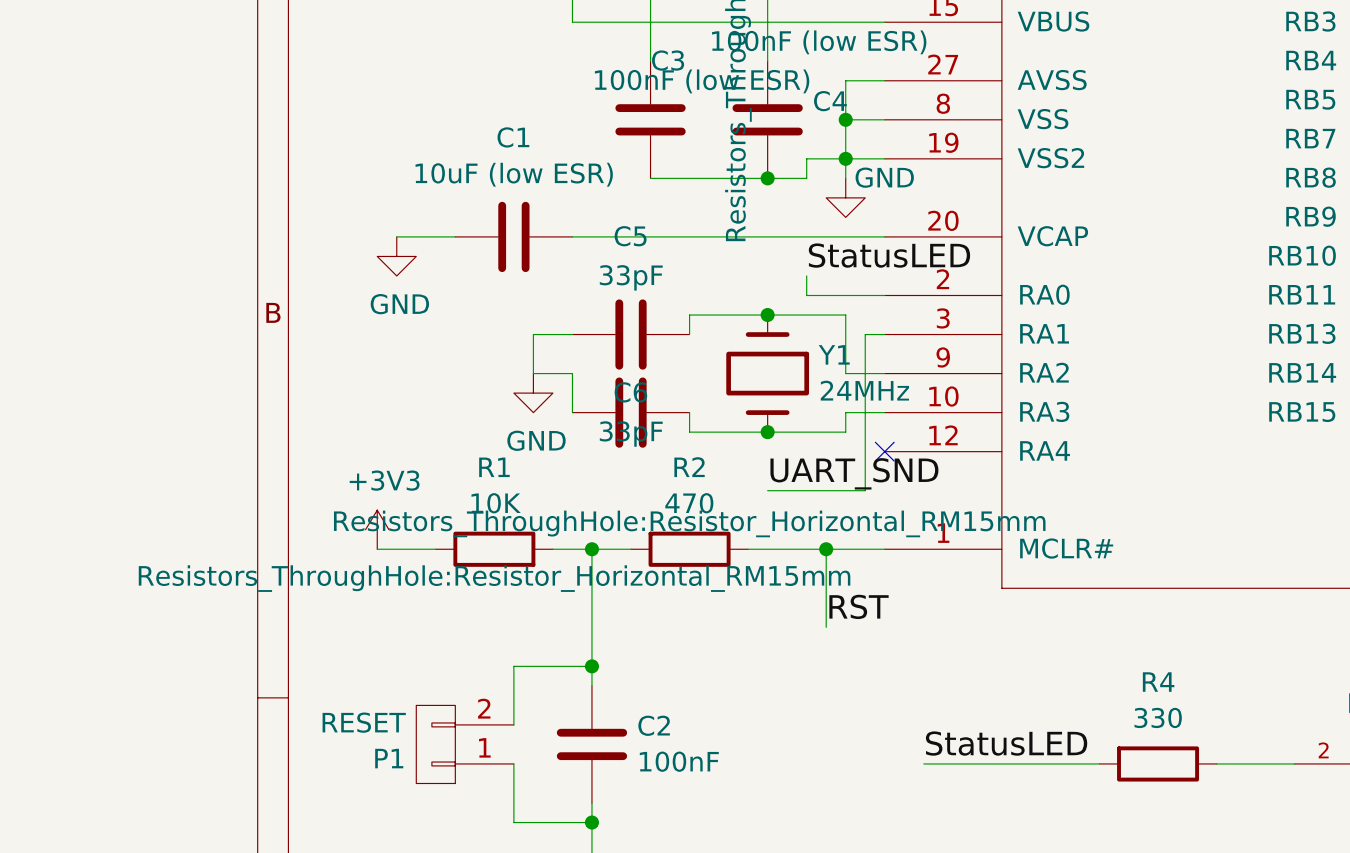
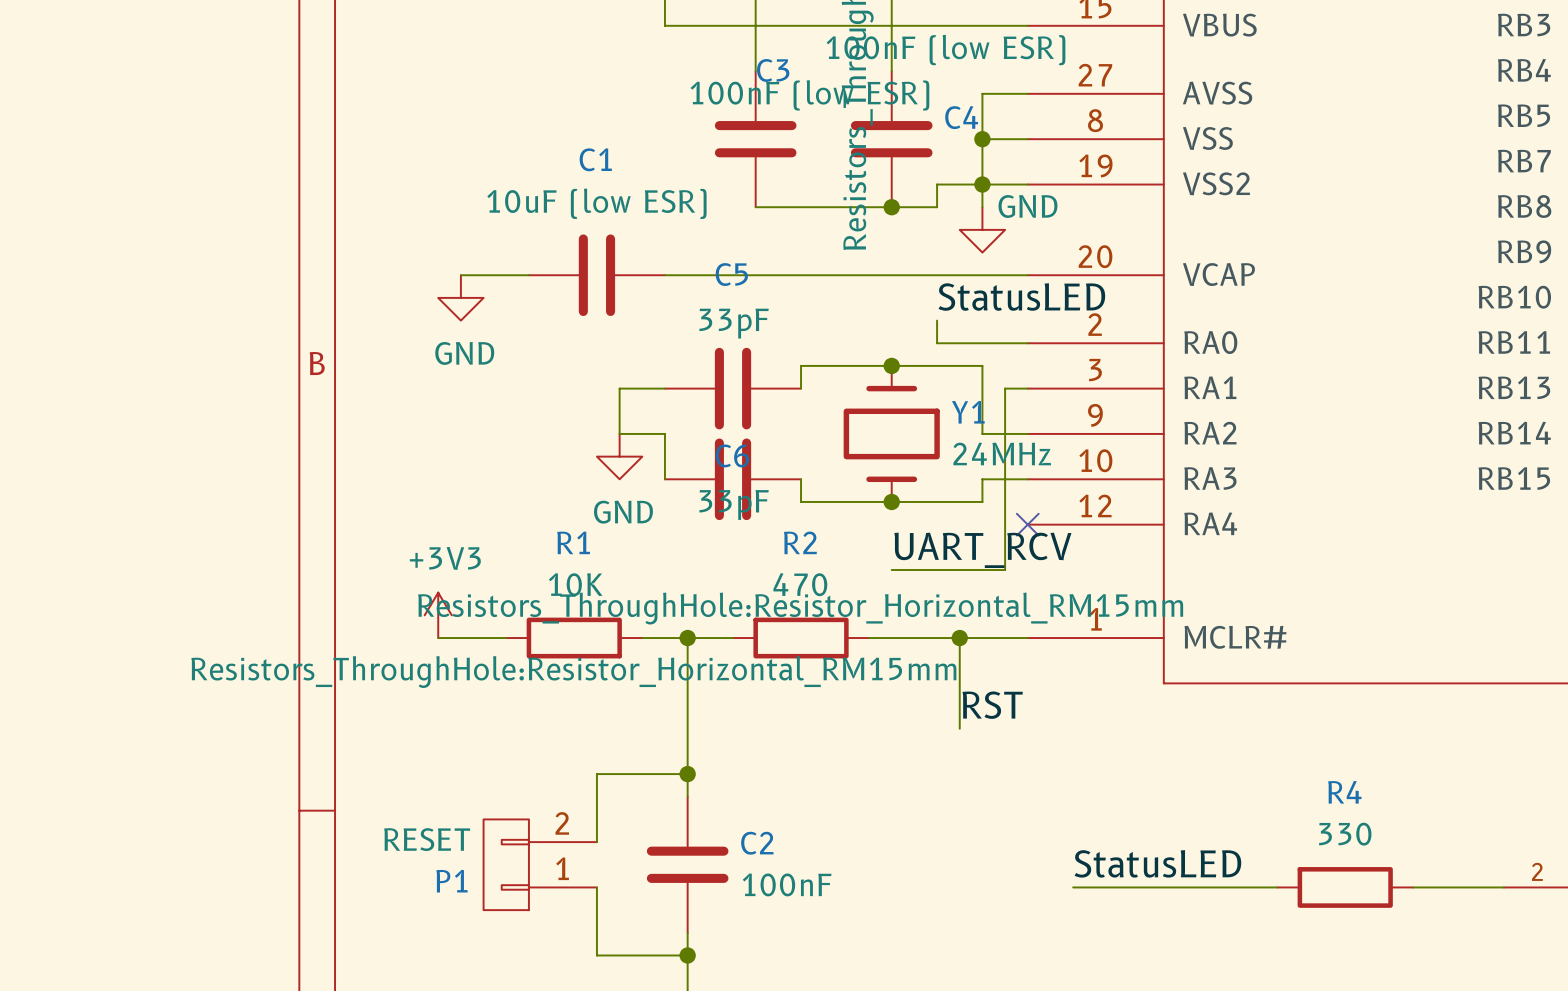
label: UART_SND (854, 473) -> UART_RCV (982, 550)

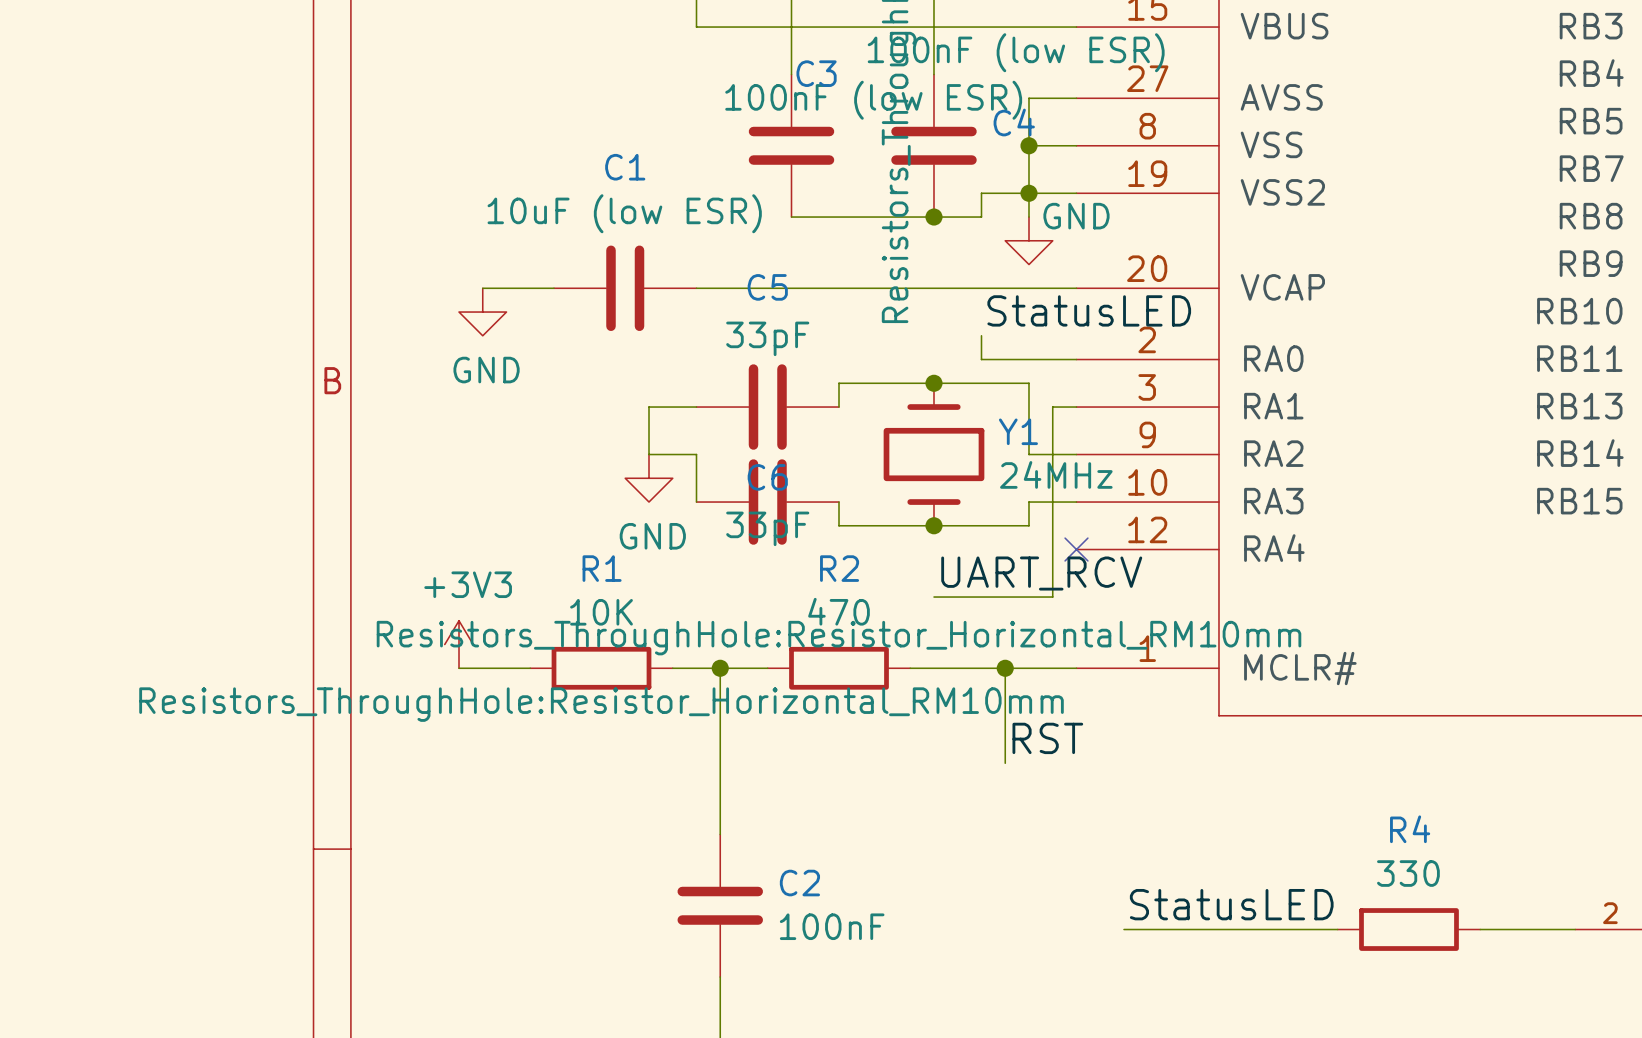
R2 text: Resistors_ThroughHole:Resistor_Horizontal_RM15mm (800, 608) -> Resistors_ThroughHole:Resistor_Horizontal_RM10mm (839, 638)
R1 text: Resistors_ThroughHole:Resistor_Horizontal_RM15mm (573, 672) -> Resistors_ThroughHole:Resistor_Horizontal_RM10mm (601, 704)
wire: (687, 774) (596, 774) (596, 842) -> none
junction: (687, 774) -> none
P1: RESET (540, 864) -> none
wire: (596, 887) (596, 955) (687, 955) -> none
junction: (687, 955) -> none

